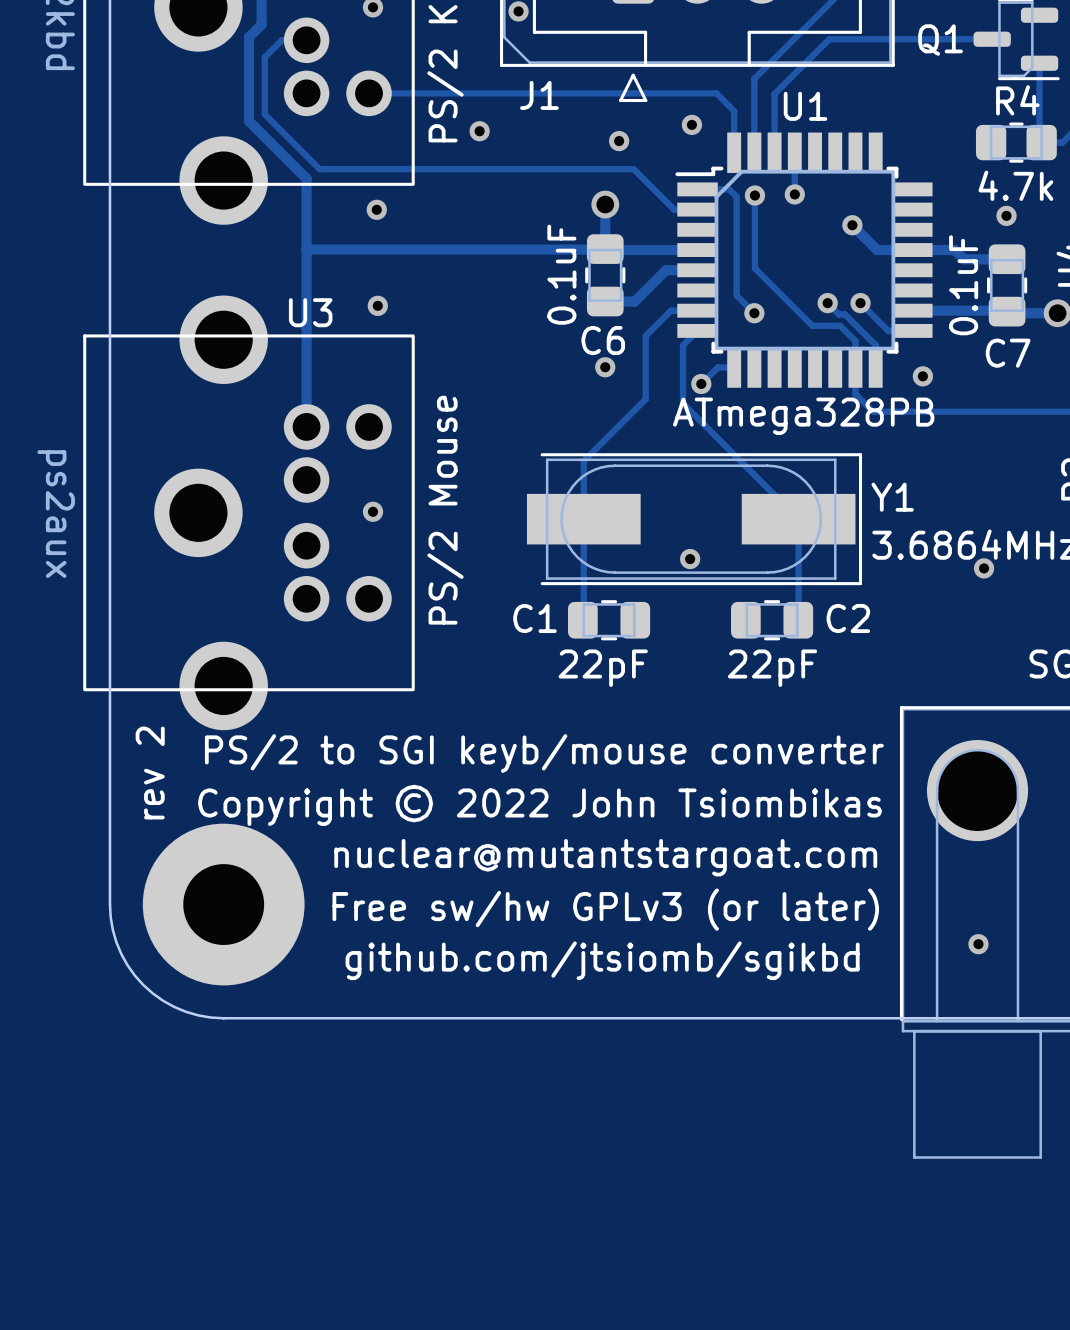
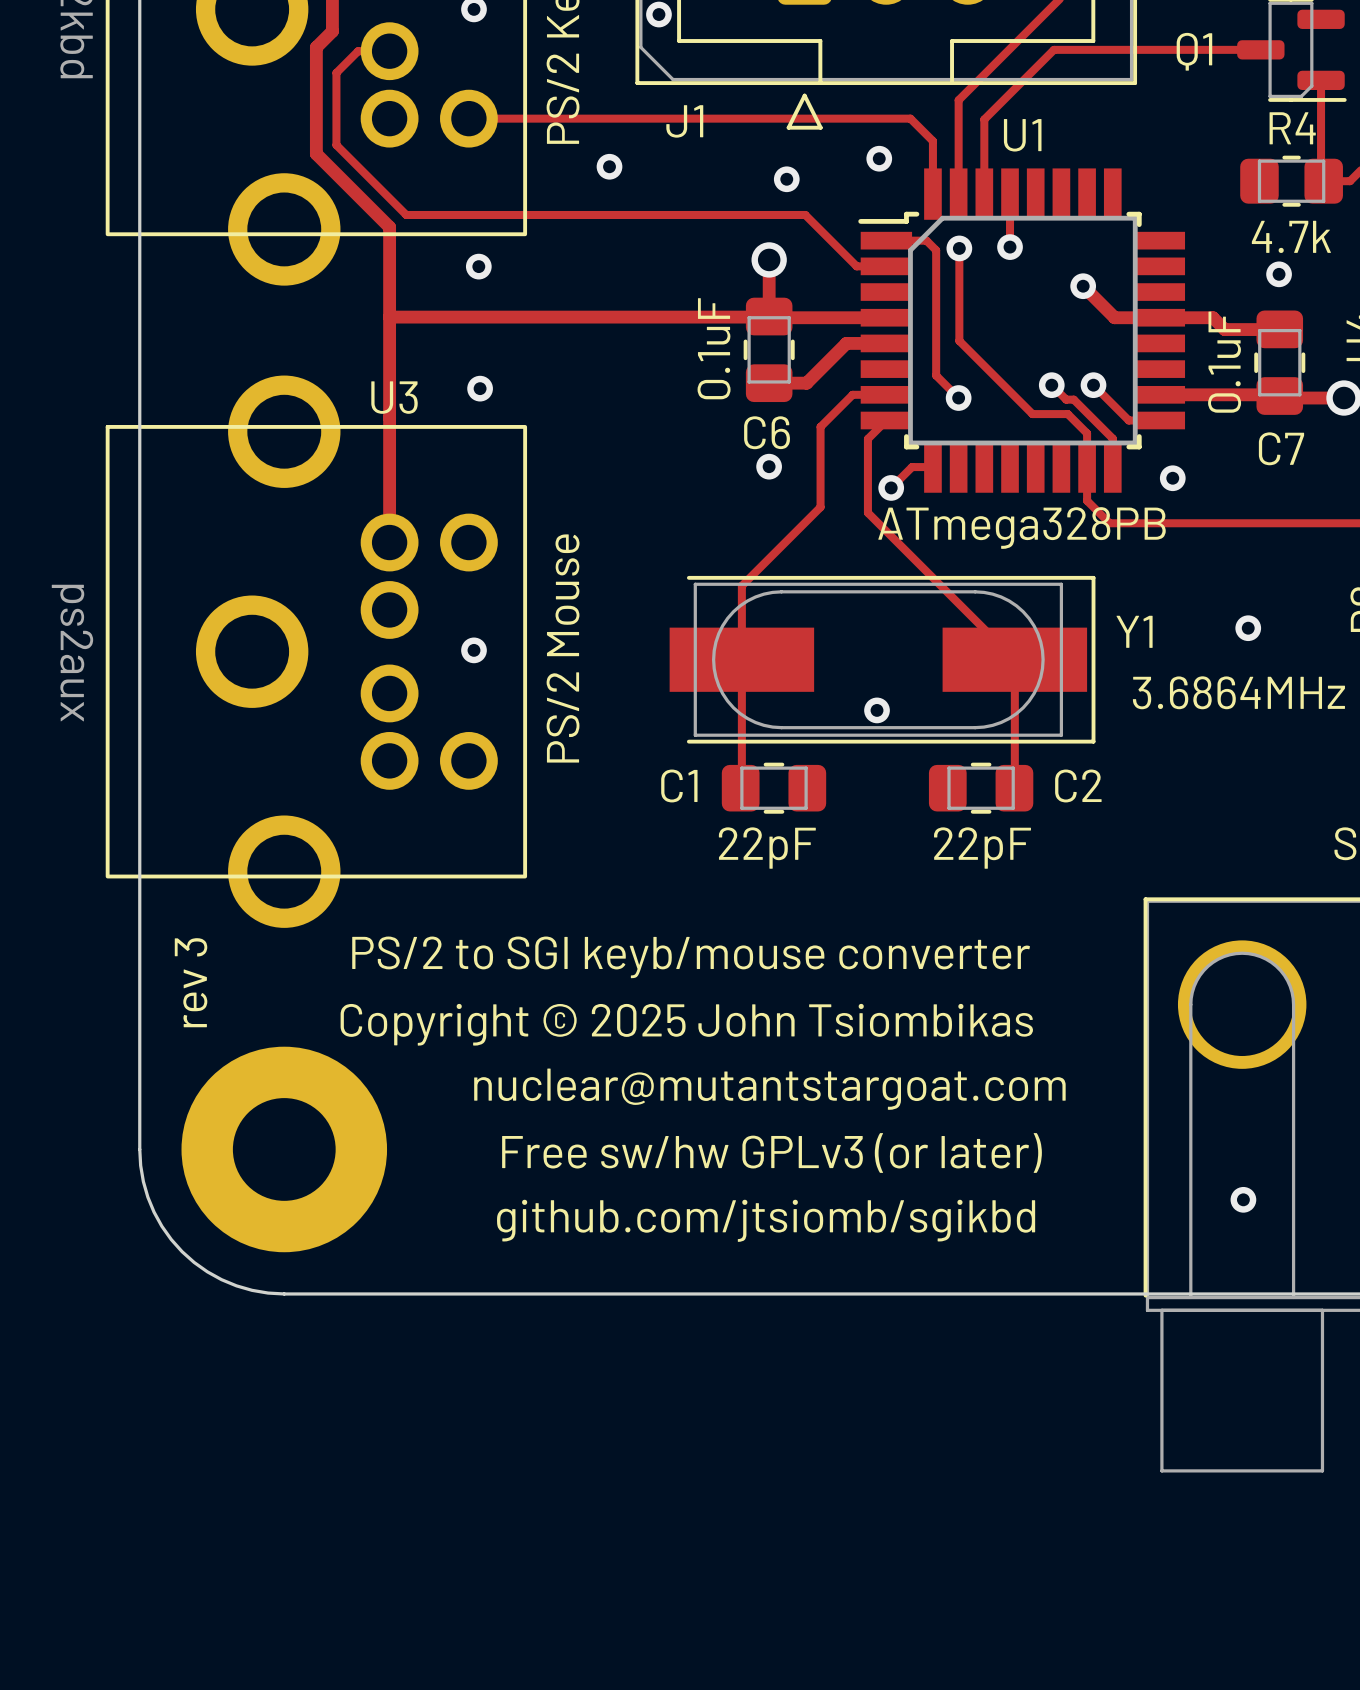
via position: (984, 568) -> (1248, 628)
text: rev 2 (150, 772) -> rev 3 (191, 982)
text: Copyright © 2022 John Tsiombikas (540, 805) -> Copyright © 2025 John Tsiombikas (686, 1024)

